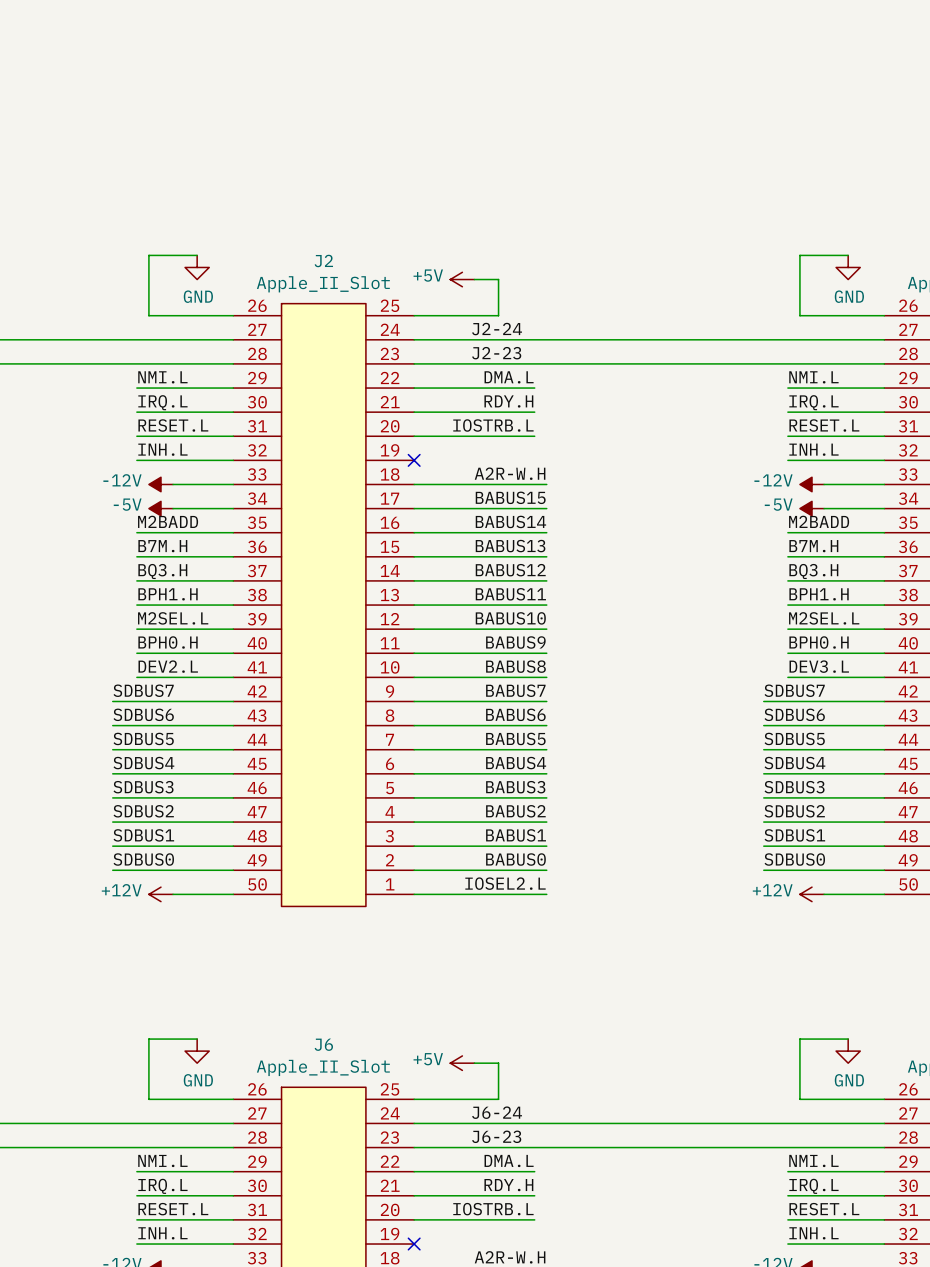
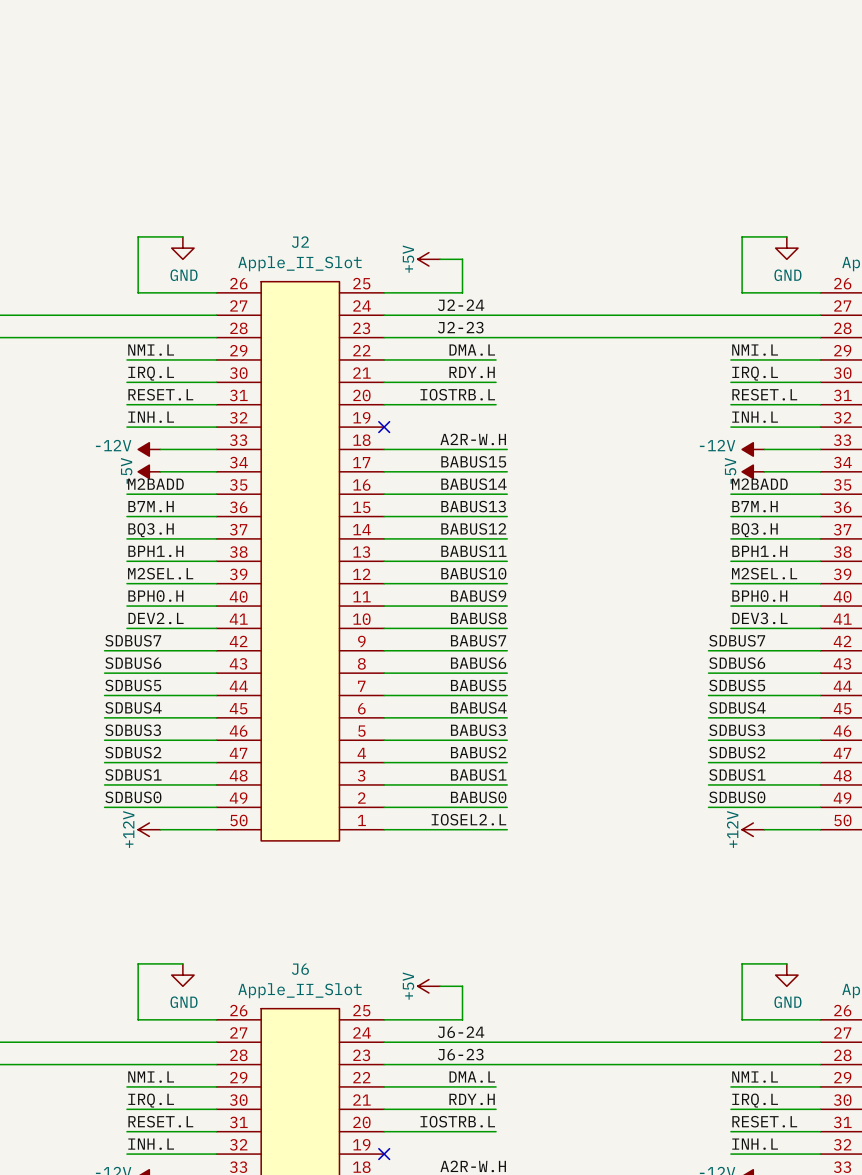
power symbol text rotation: 0° (428, 275) -> 90° counterclockwise (408, 259)
power symbol text rotation: 0° (127, 504) -> 90° counterclockwise (126, 470)
power symbol text rotation: 0° (778, 504) -> 90° counterclockwise (730, 470)
power symbol text rotation: 0° (121, 890) -> 90° counterclockwise (128, 829)
power symbol text rotation: 0° (772, 890) -> 90° counterclockwise (732, 829)
power symbol text rotation: 0° (428, 1059) -> 90° counterclockwise (408, 986)

